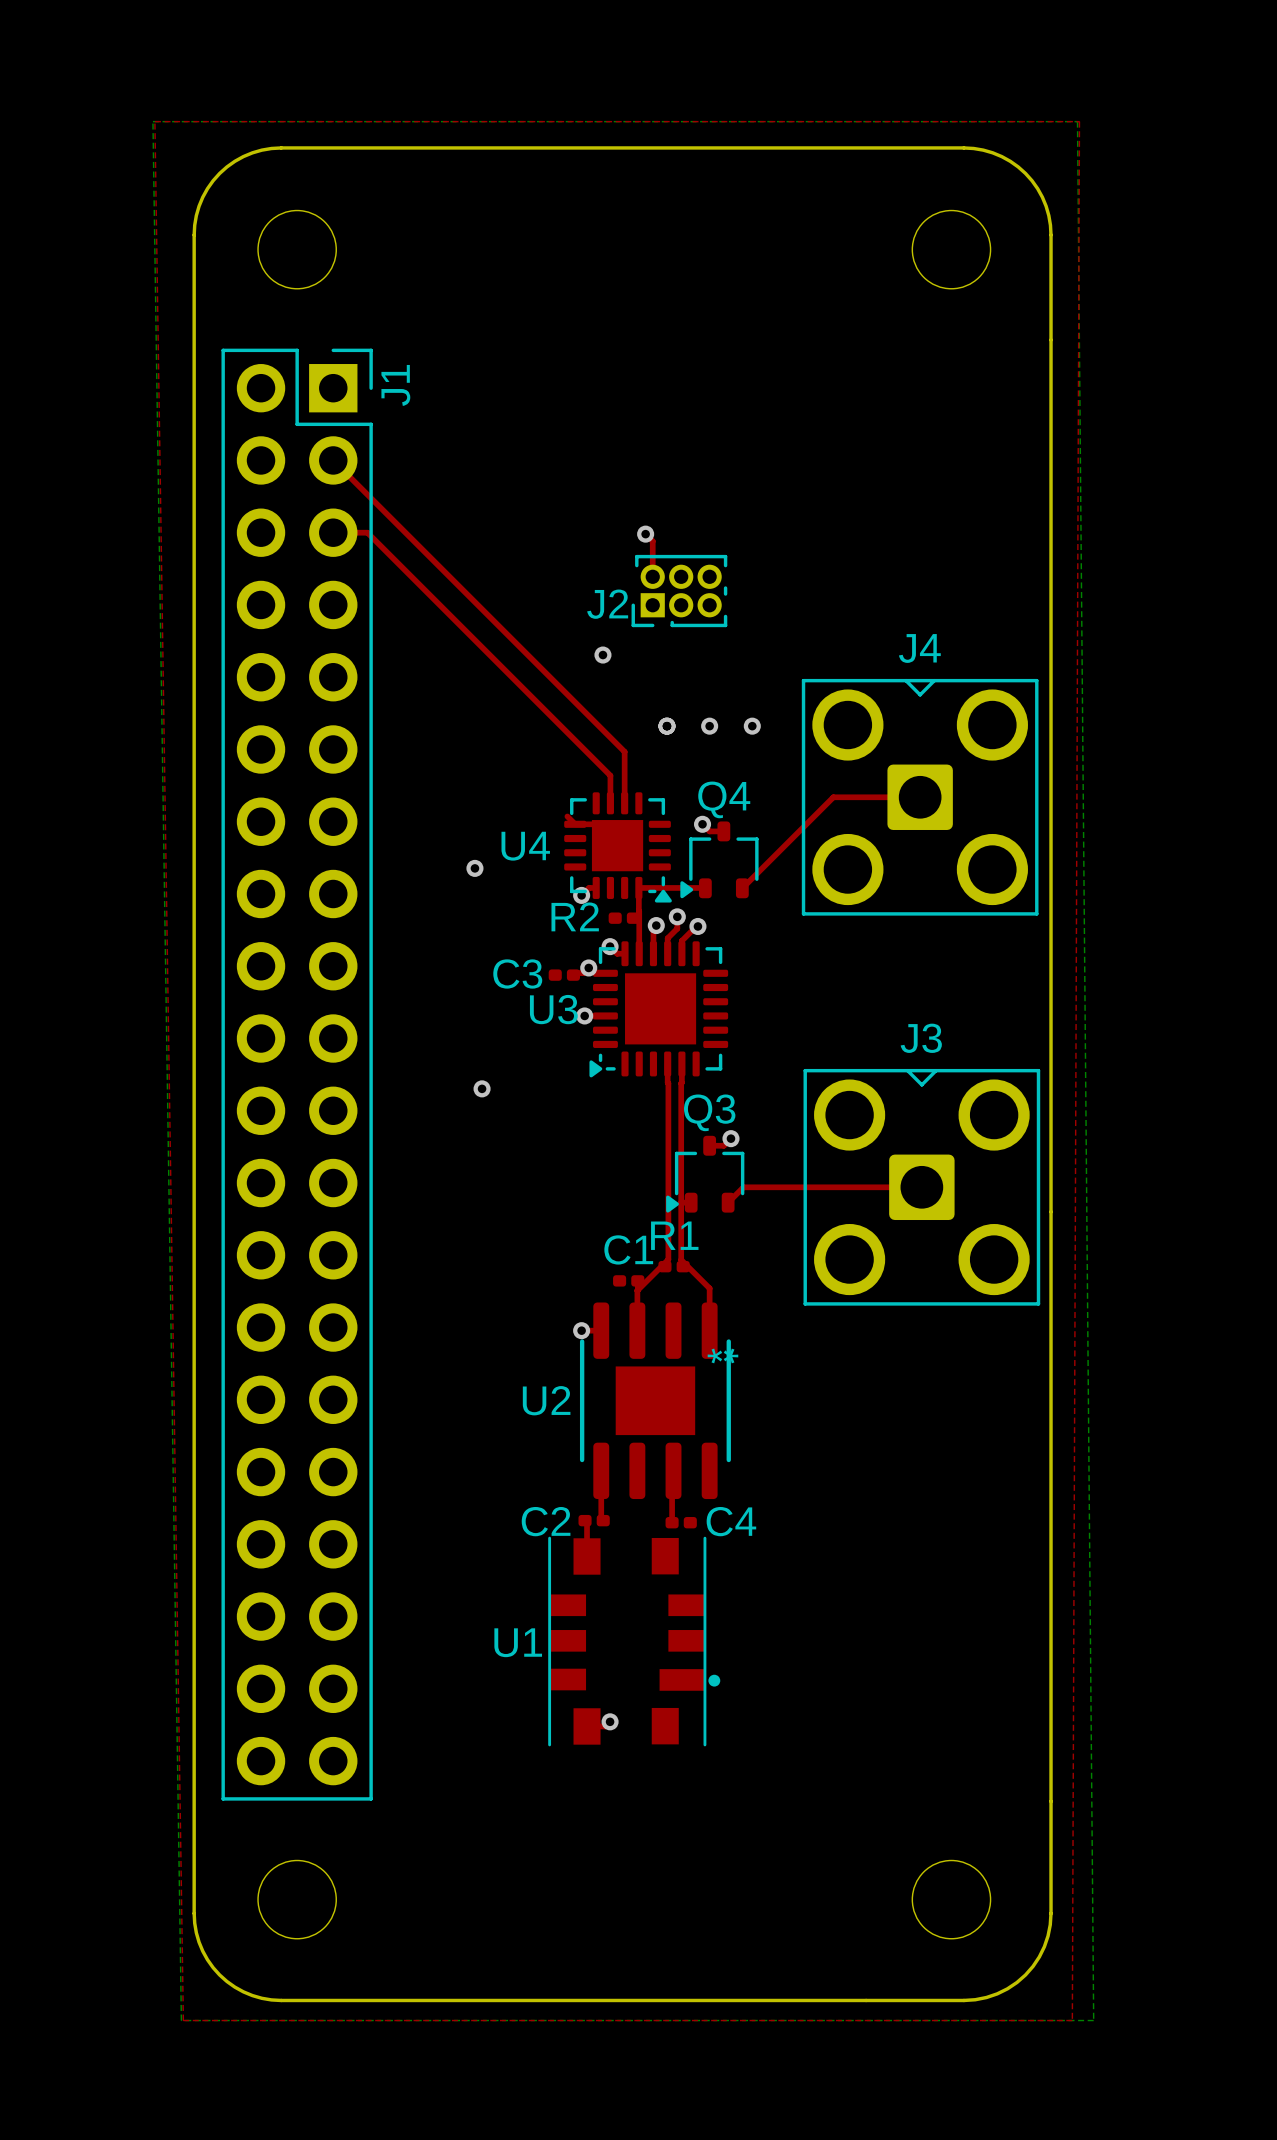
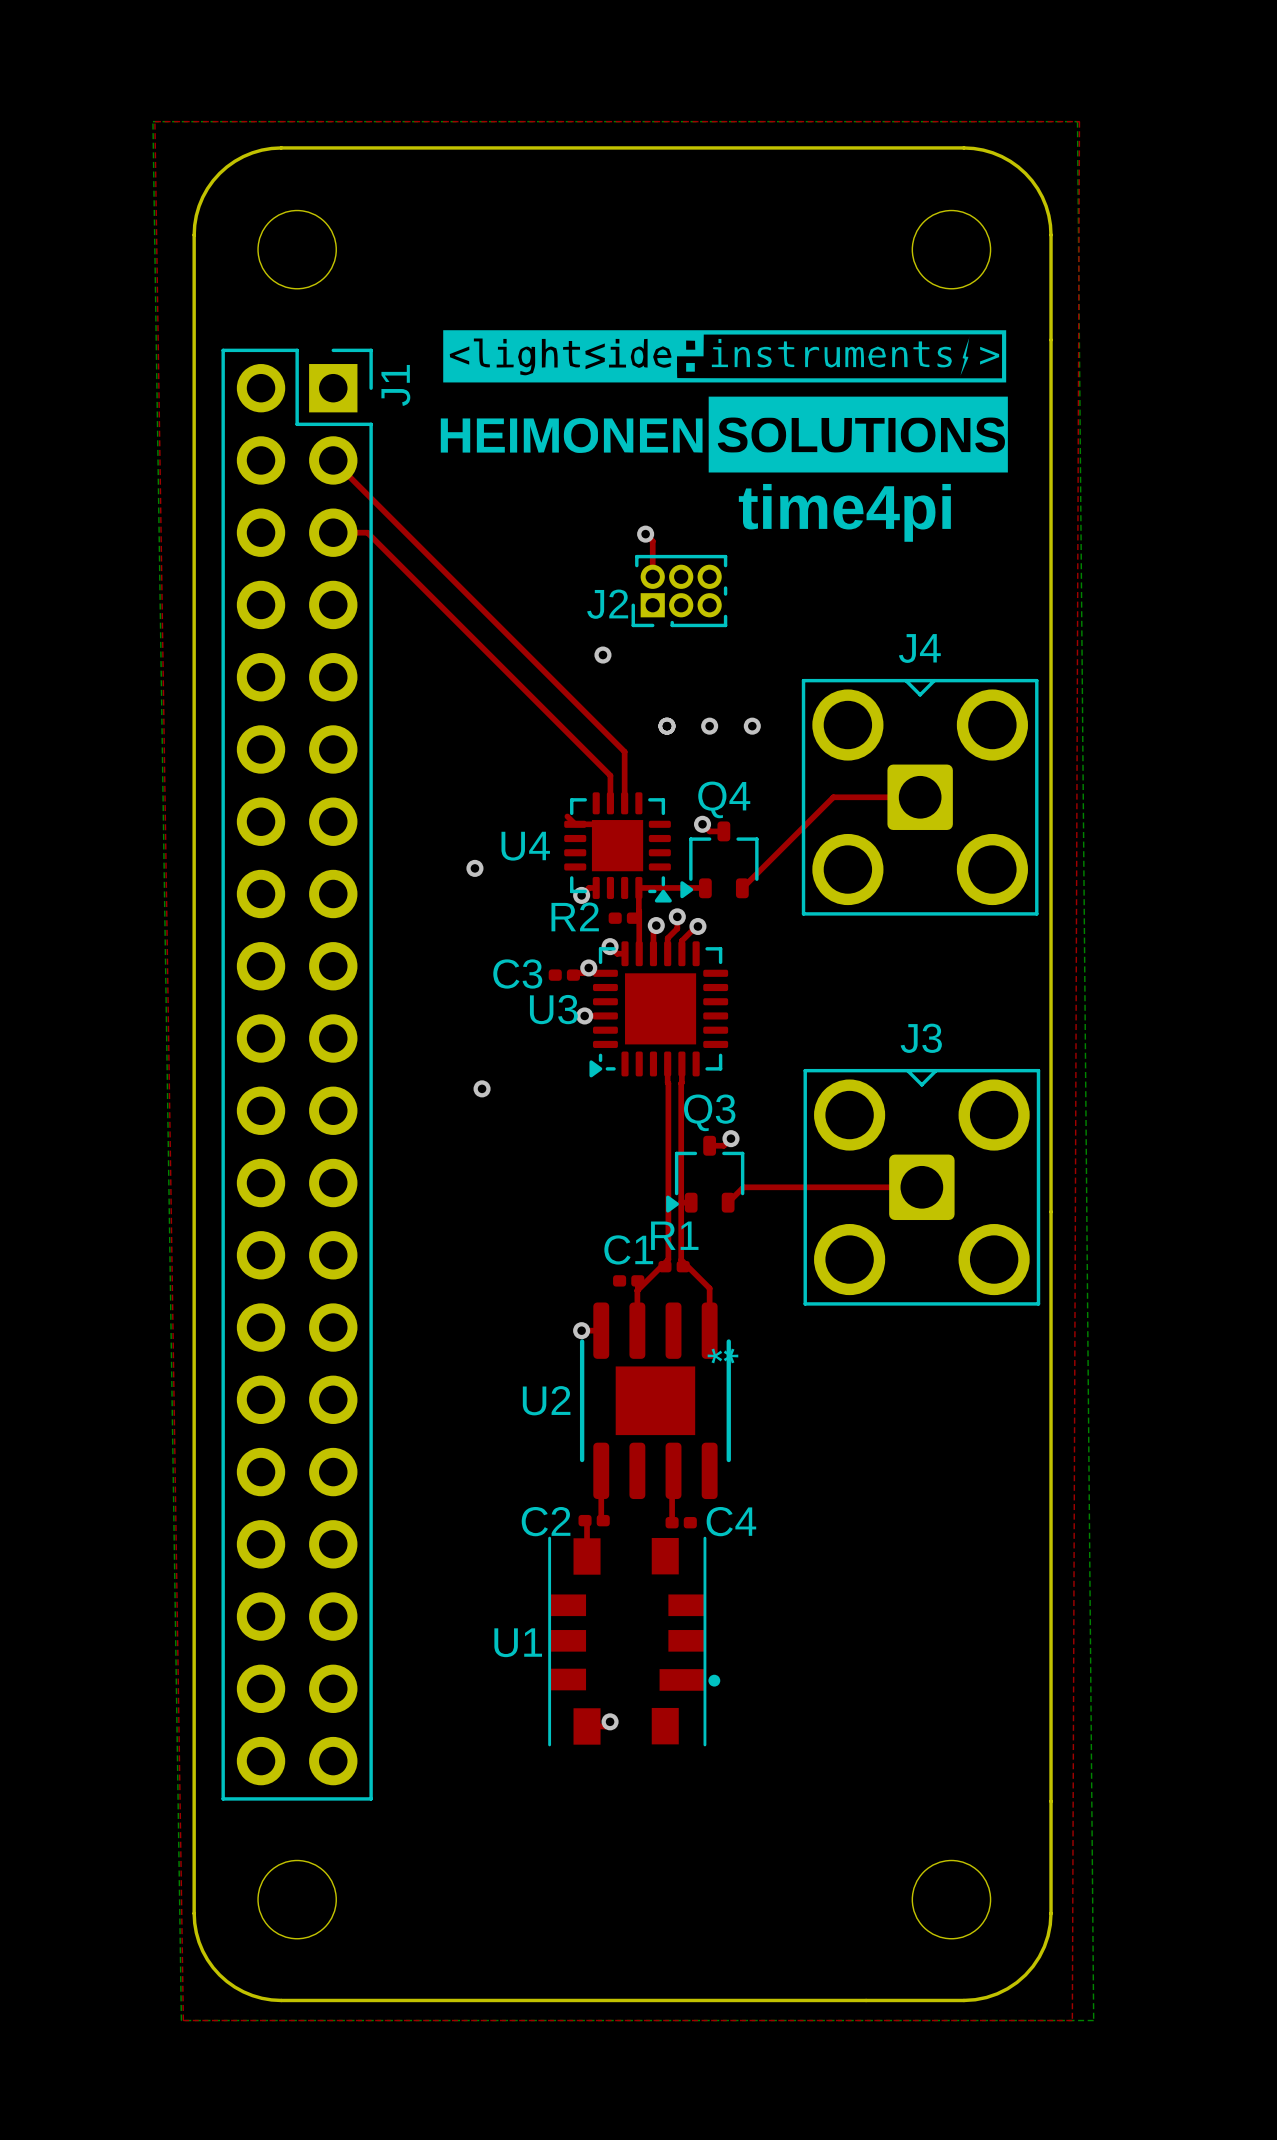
drawing: none -> [440, 330, 1008, 473]
text: none -> time4pi (844, 512)

